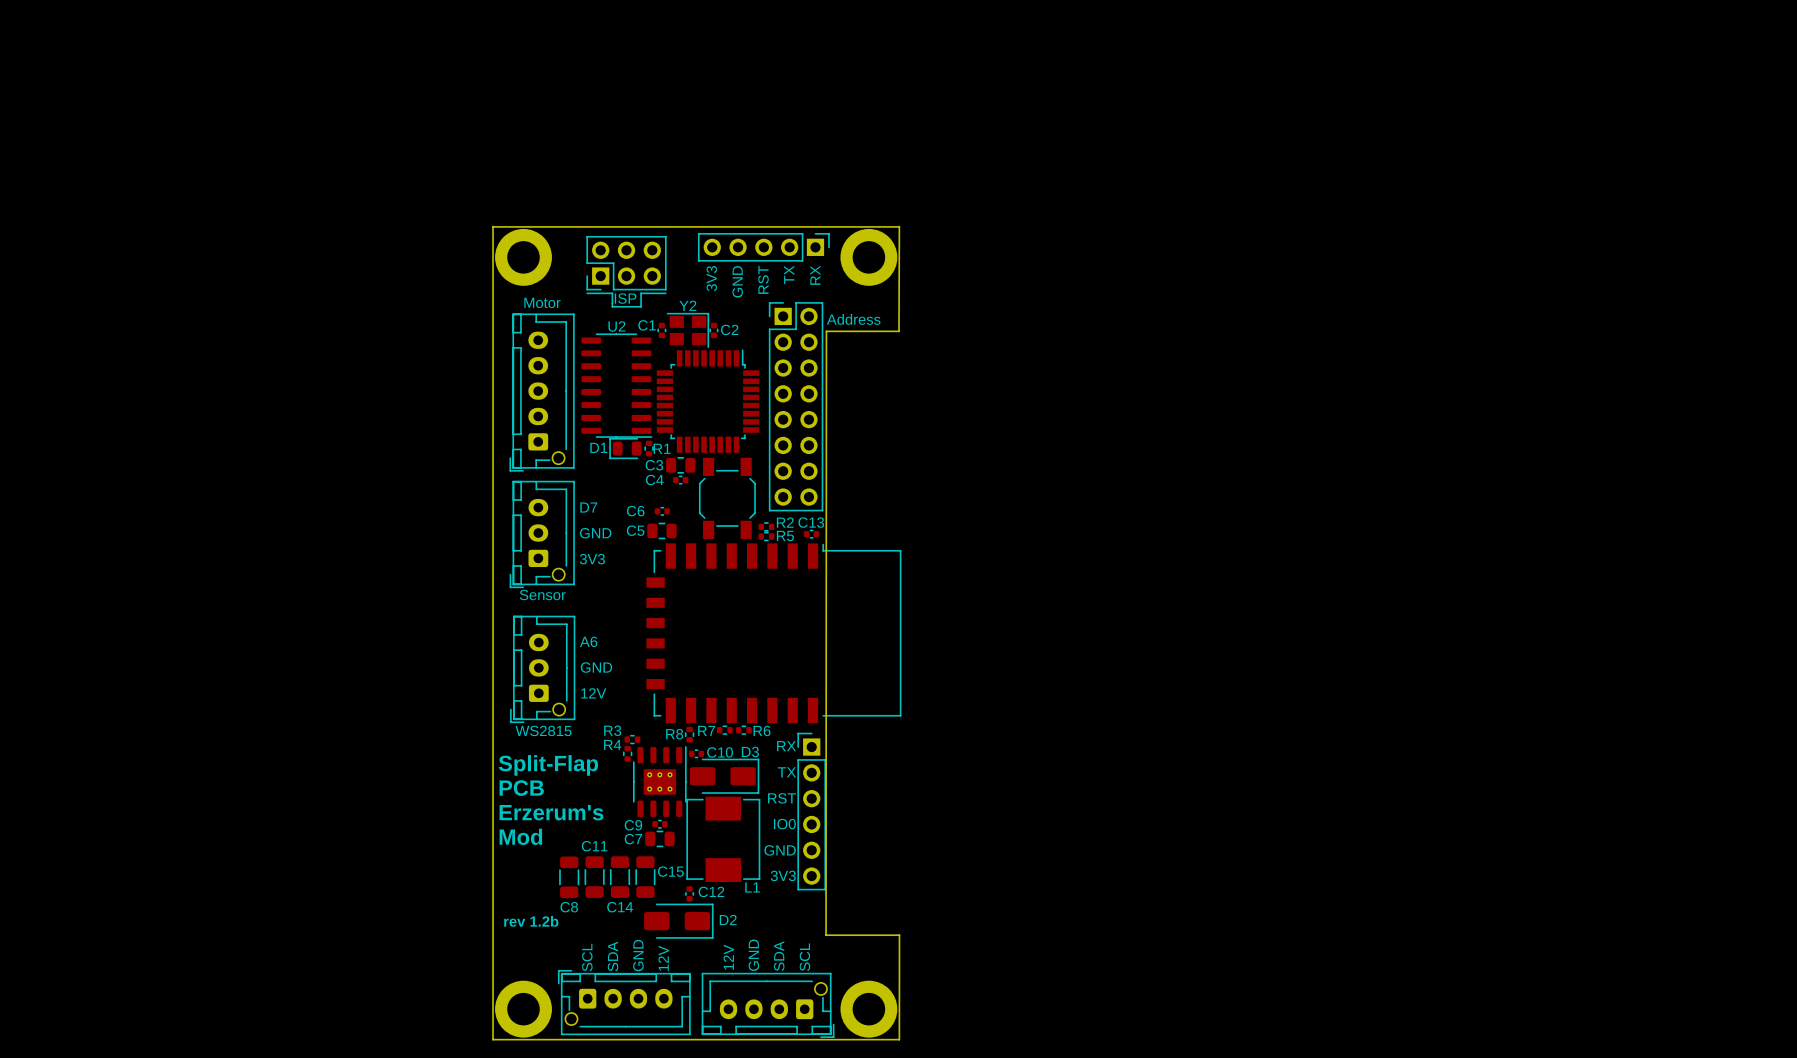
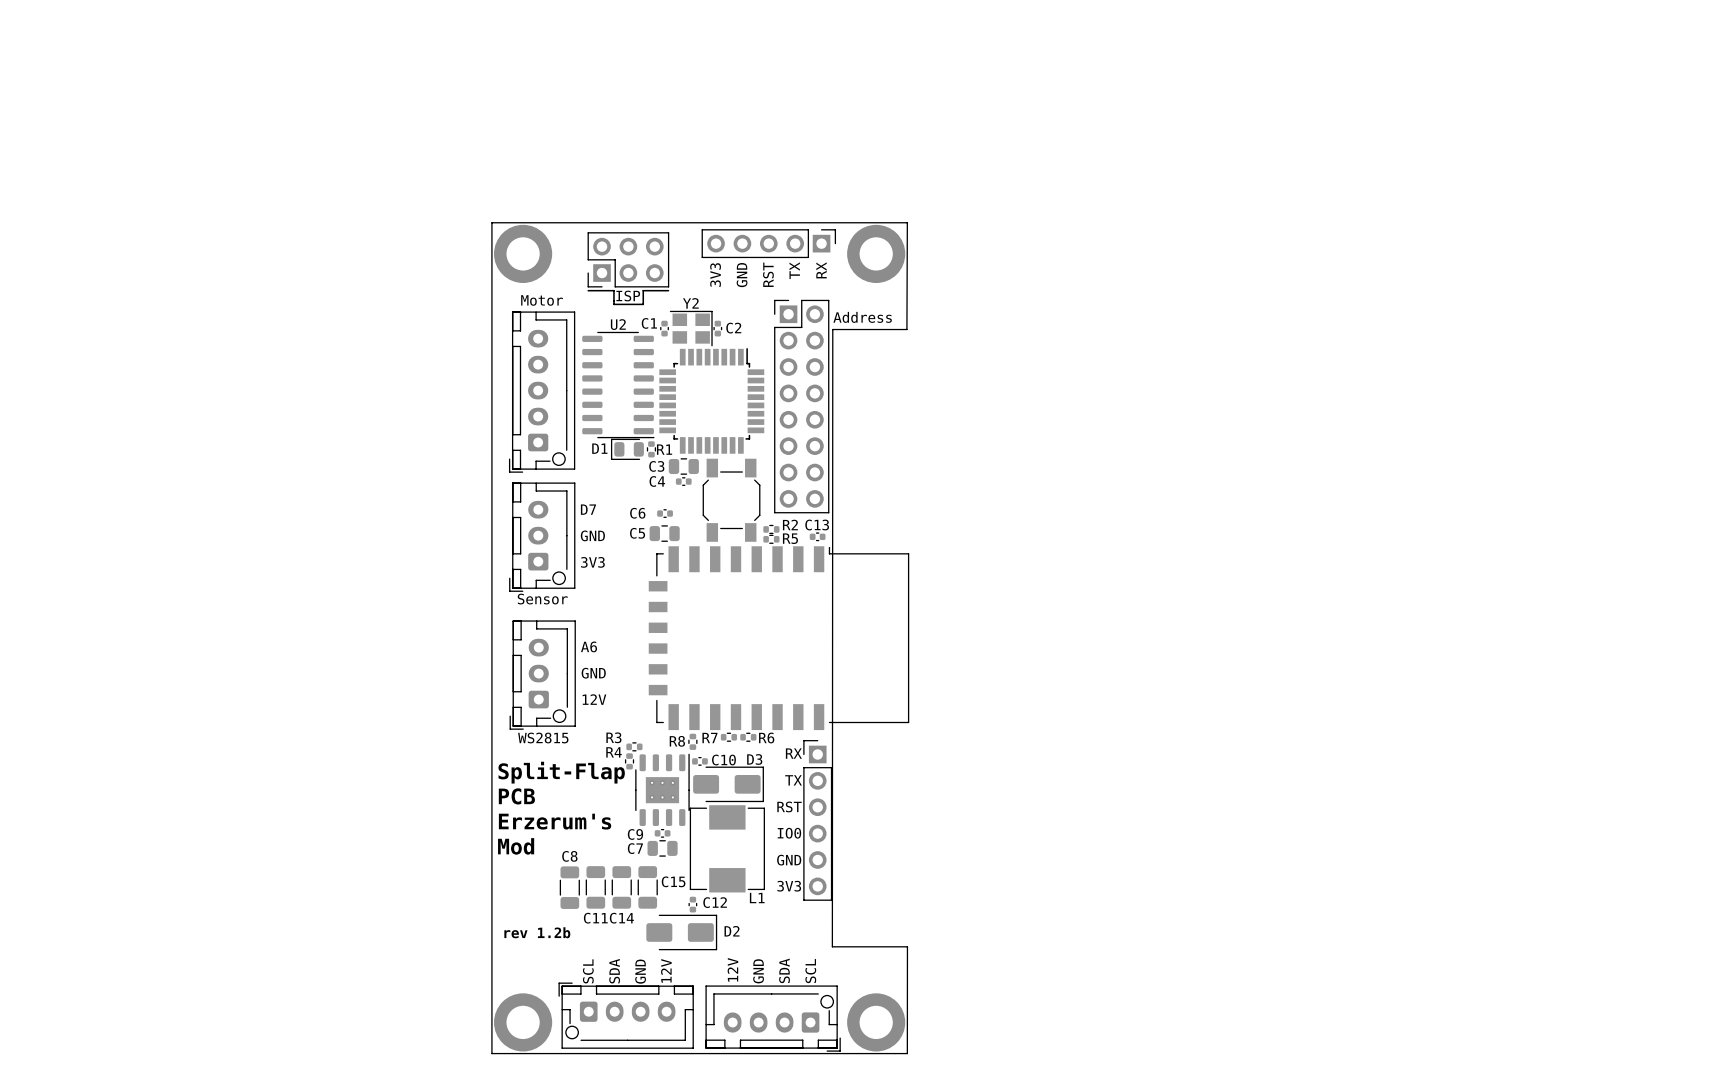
C11 name position: C11 (594, 846) -> C11 (595, 918)
C8 name position: C8 (569, 907) -> C8 (569, 856)

